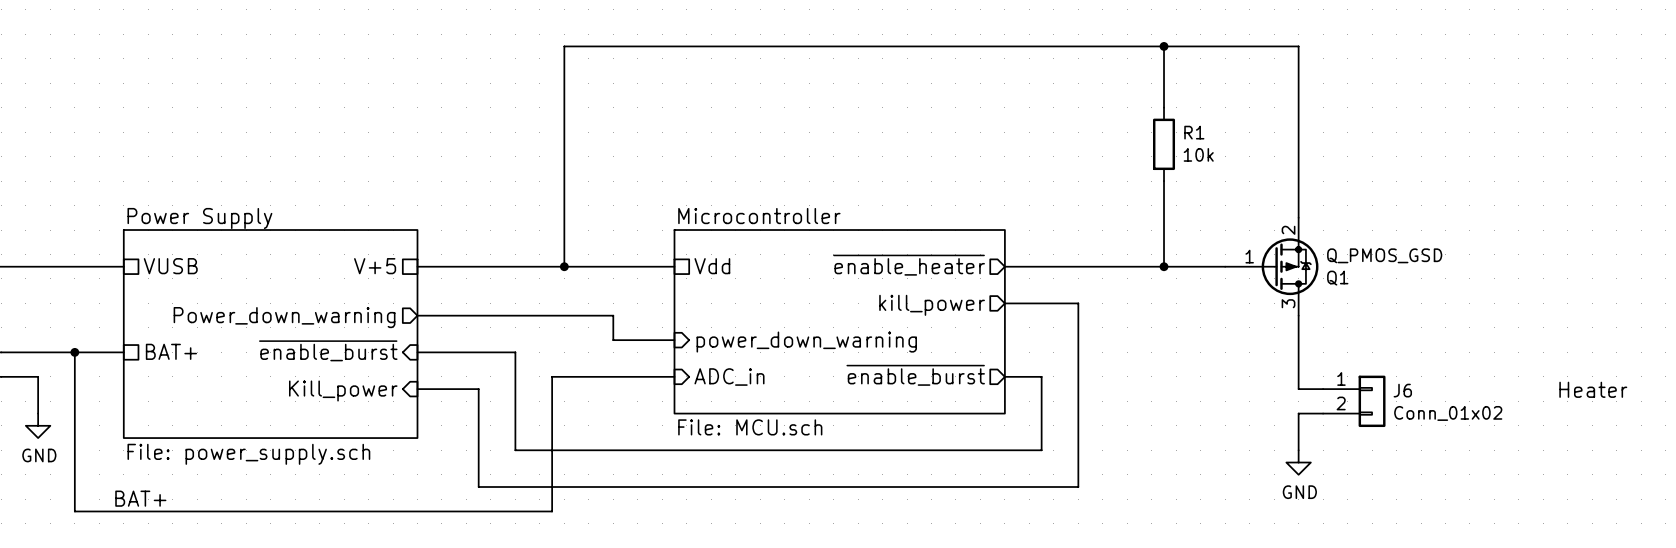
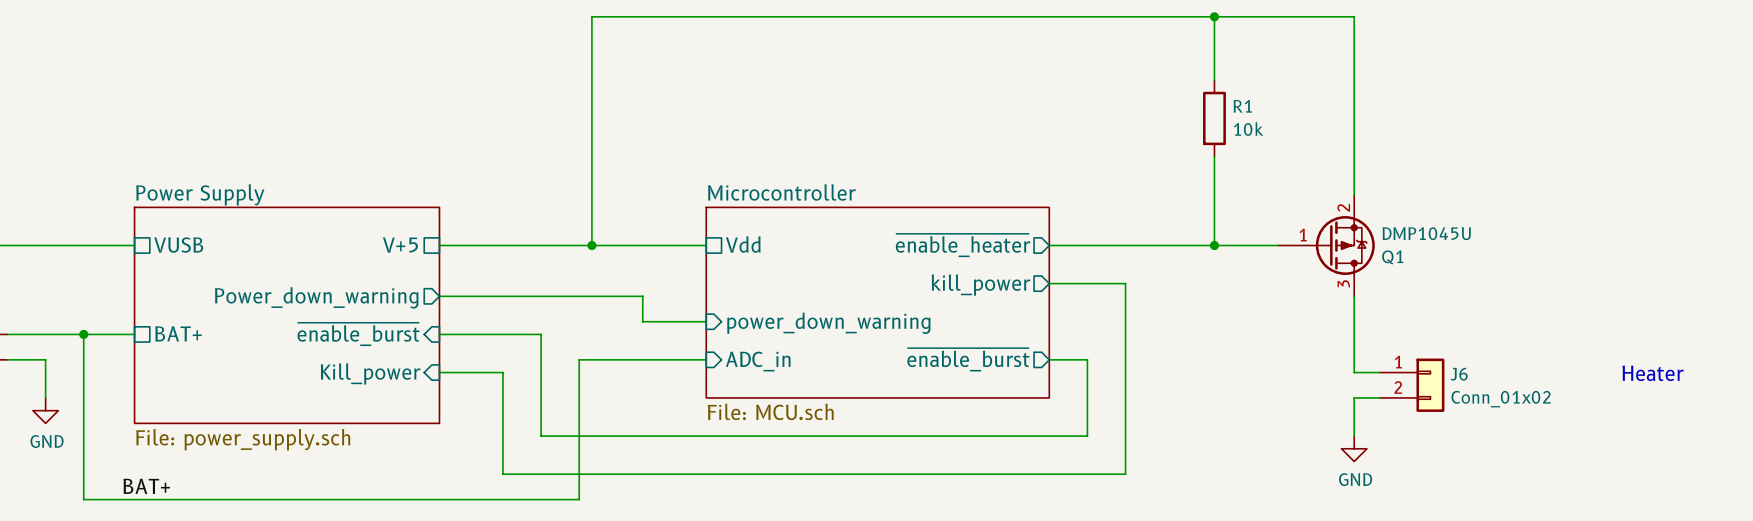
Q1 value: Q_PMOS_GSD (1384, 255) -> DMP1045U (1426, 233)

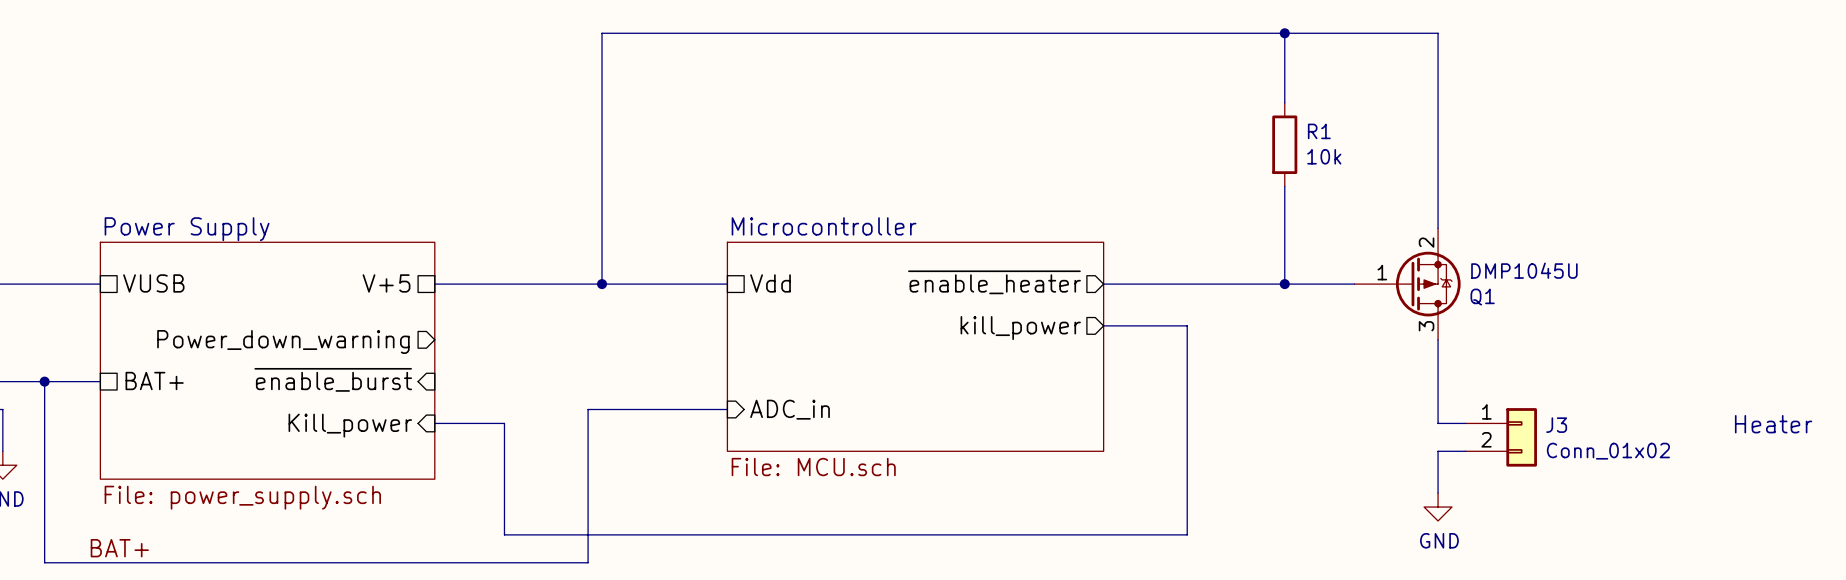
wire: (439, 296) (642, 296) (642, 321) (706, 321) -> none
sheet pin: power_down_warning (828, 323) -> none
wire: (439, 334) (541, 334) (541, 436) (1087, 436) (1087, 359) (1049, 359) -> none
sheet pin: ~{enable_burst} (968, 359) -> none
J6 name: J6 (1459, 374) -> J3 (1556, 425)

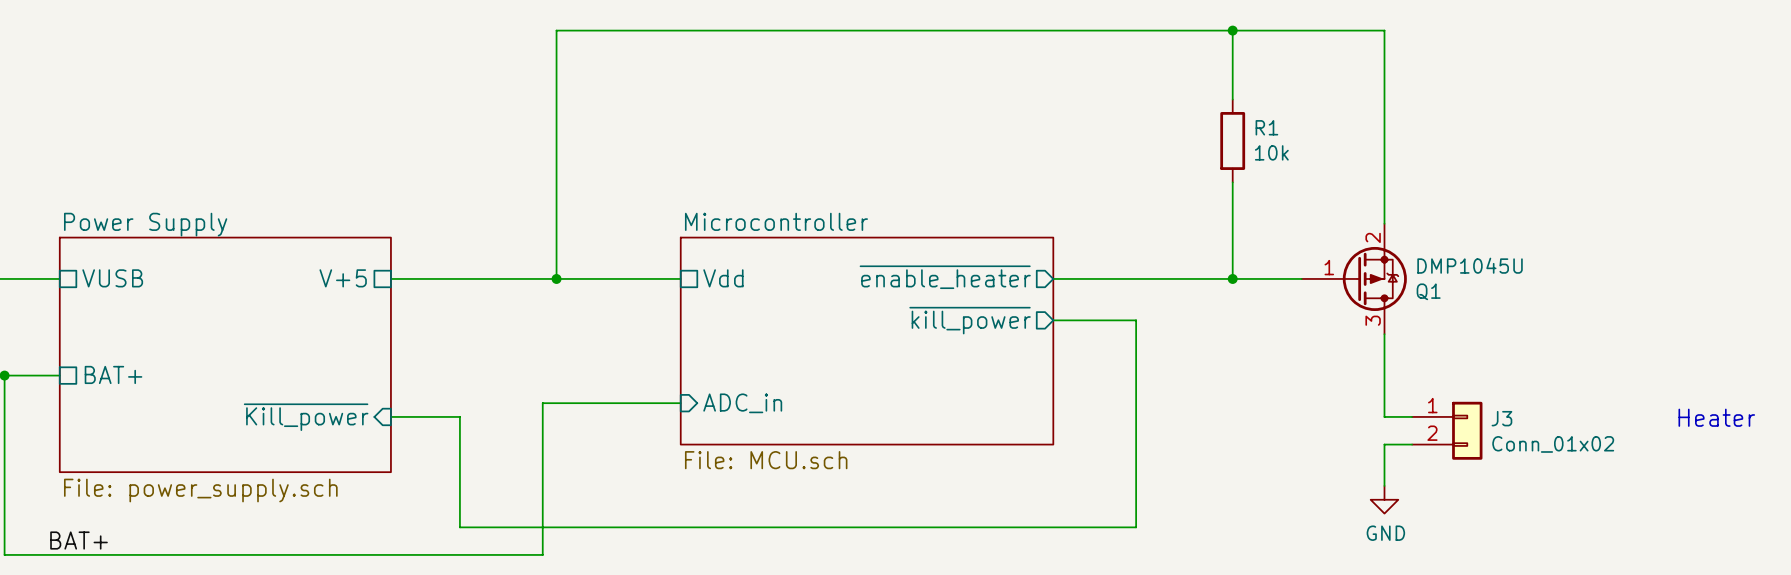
sheet pin: kill_power (1020, 328) -> ~{kill_power} (970, 320)
sheet pin: Power_down_warning (283, 341) -> none
sheet pin: ~{enable_burst} (333, 379) -> none
sheet pin: Kill_power (350, 425) -> ~{Kill_power} (306, 417)

